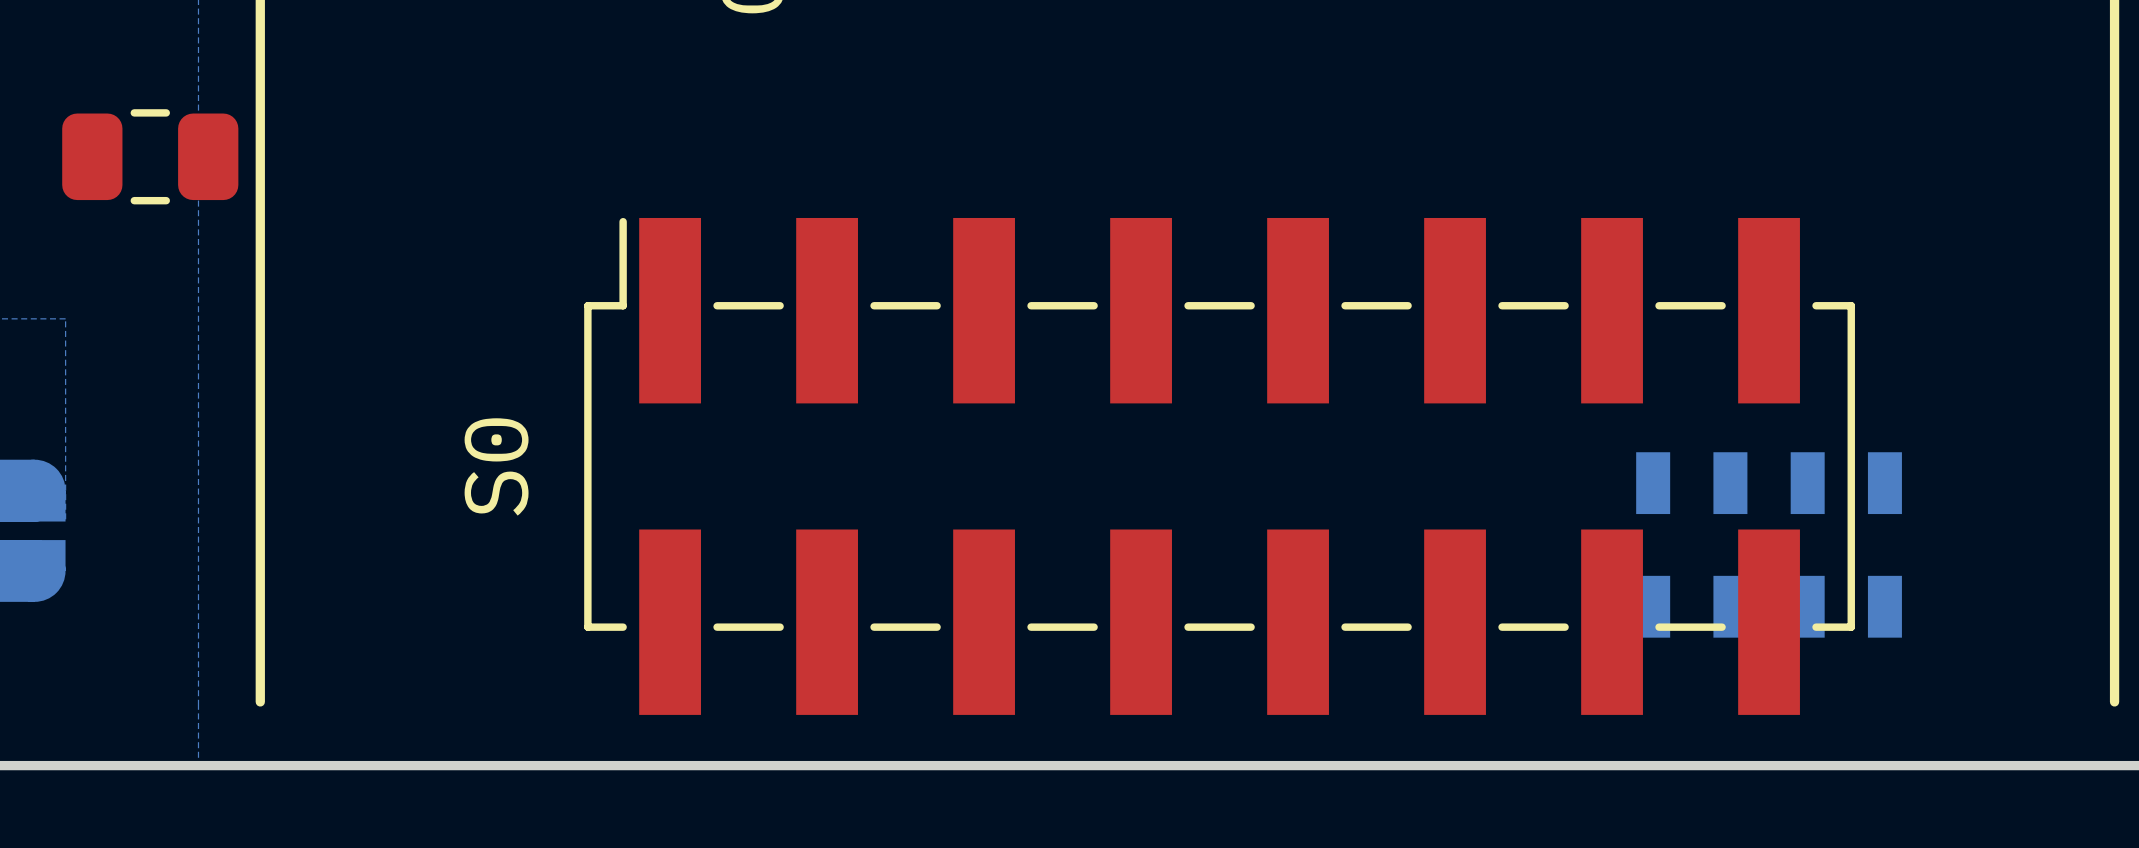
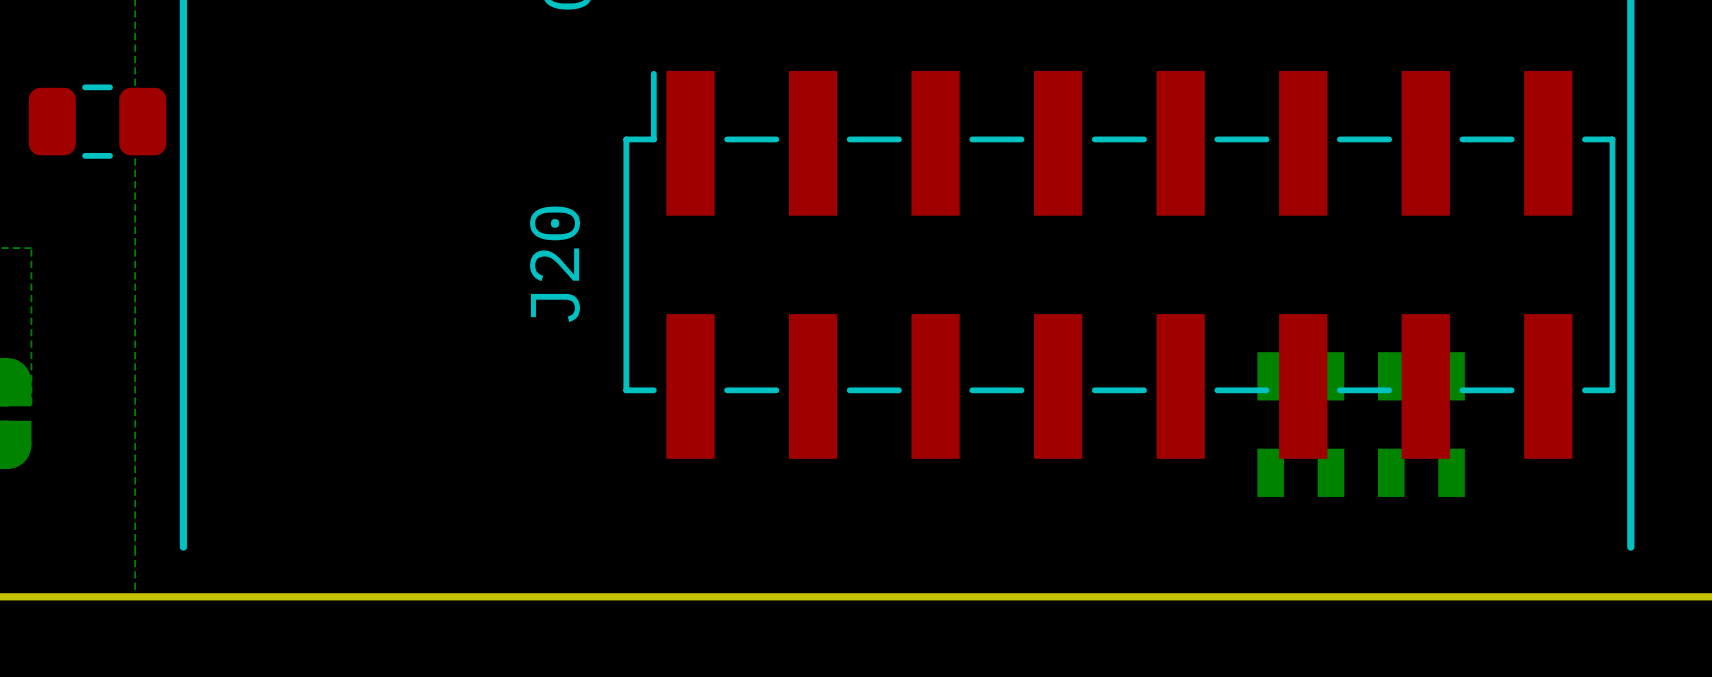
J20: none -> (1119, 264)
S0: (1219, 466) -> none

